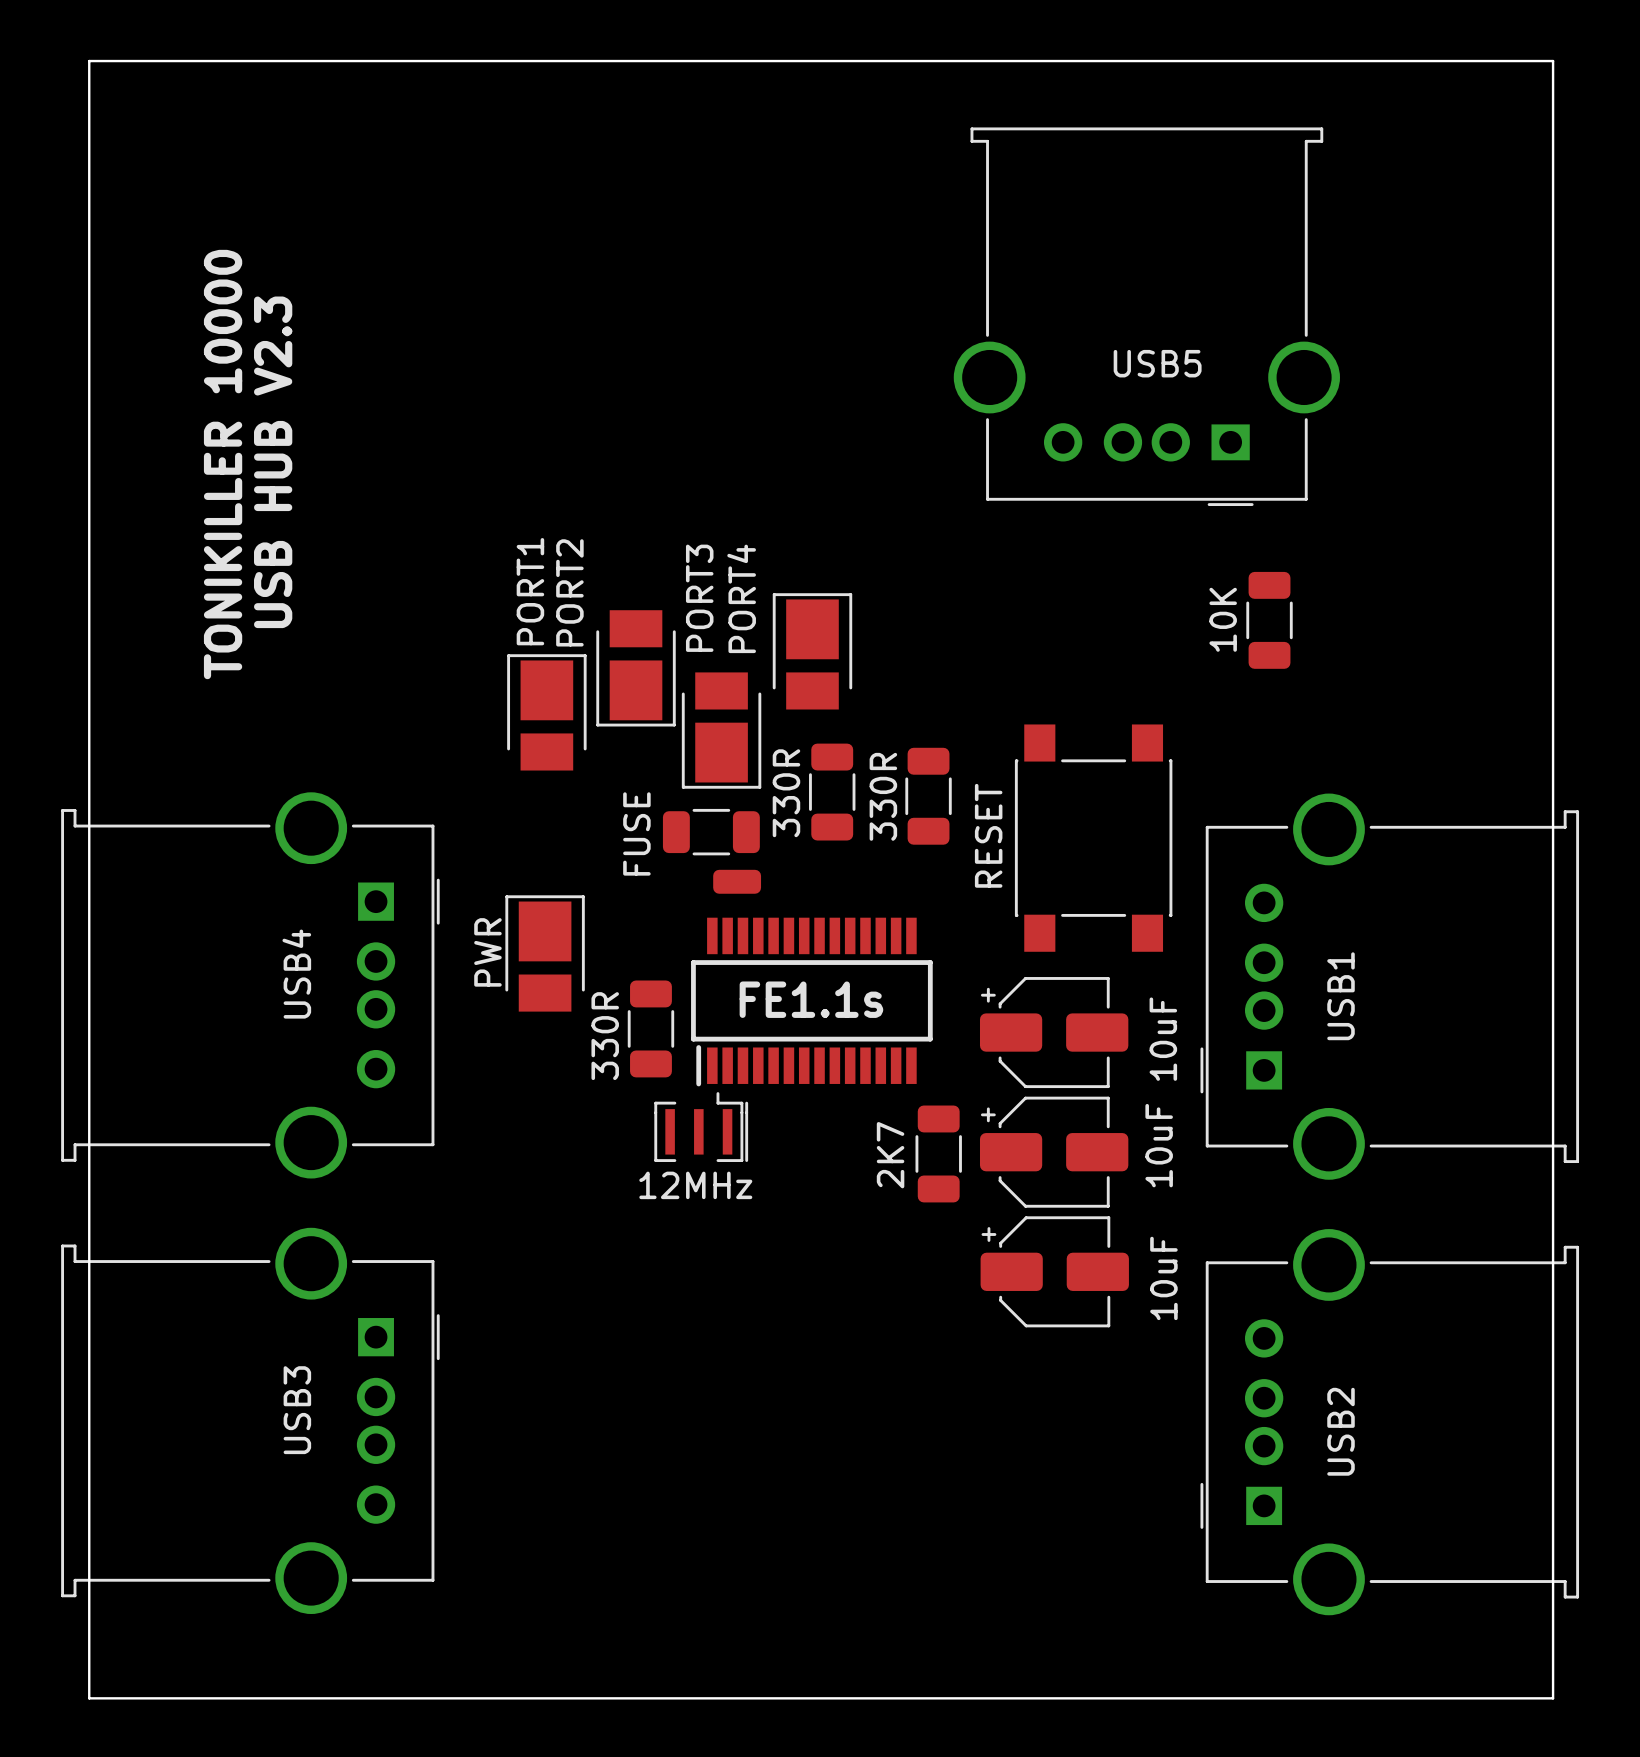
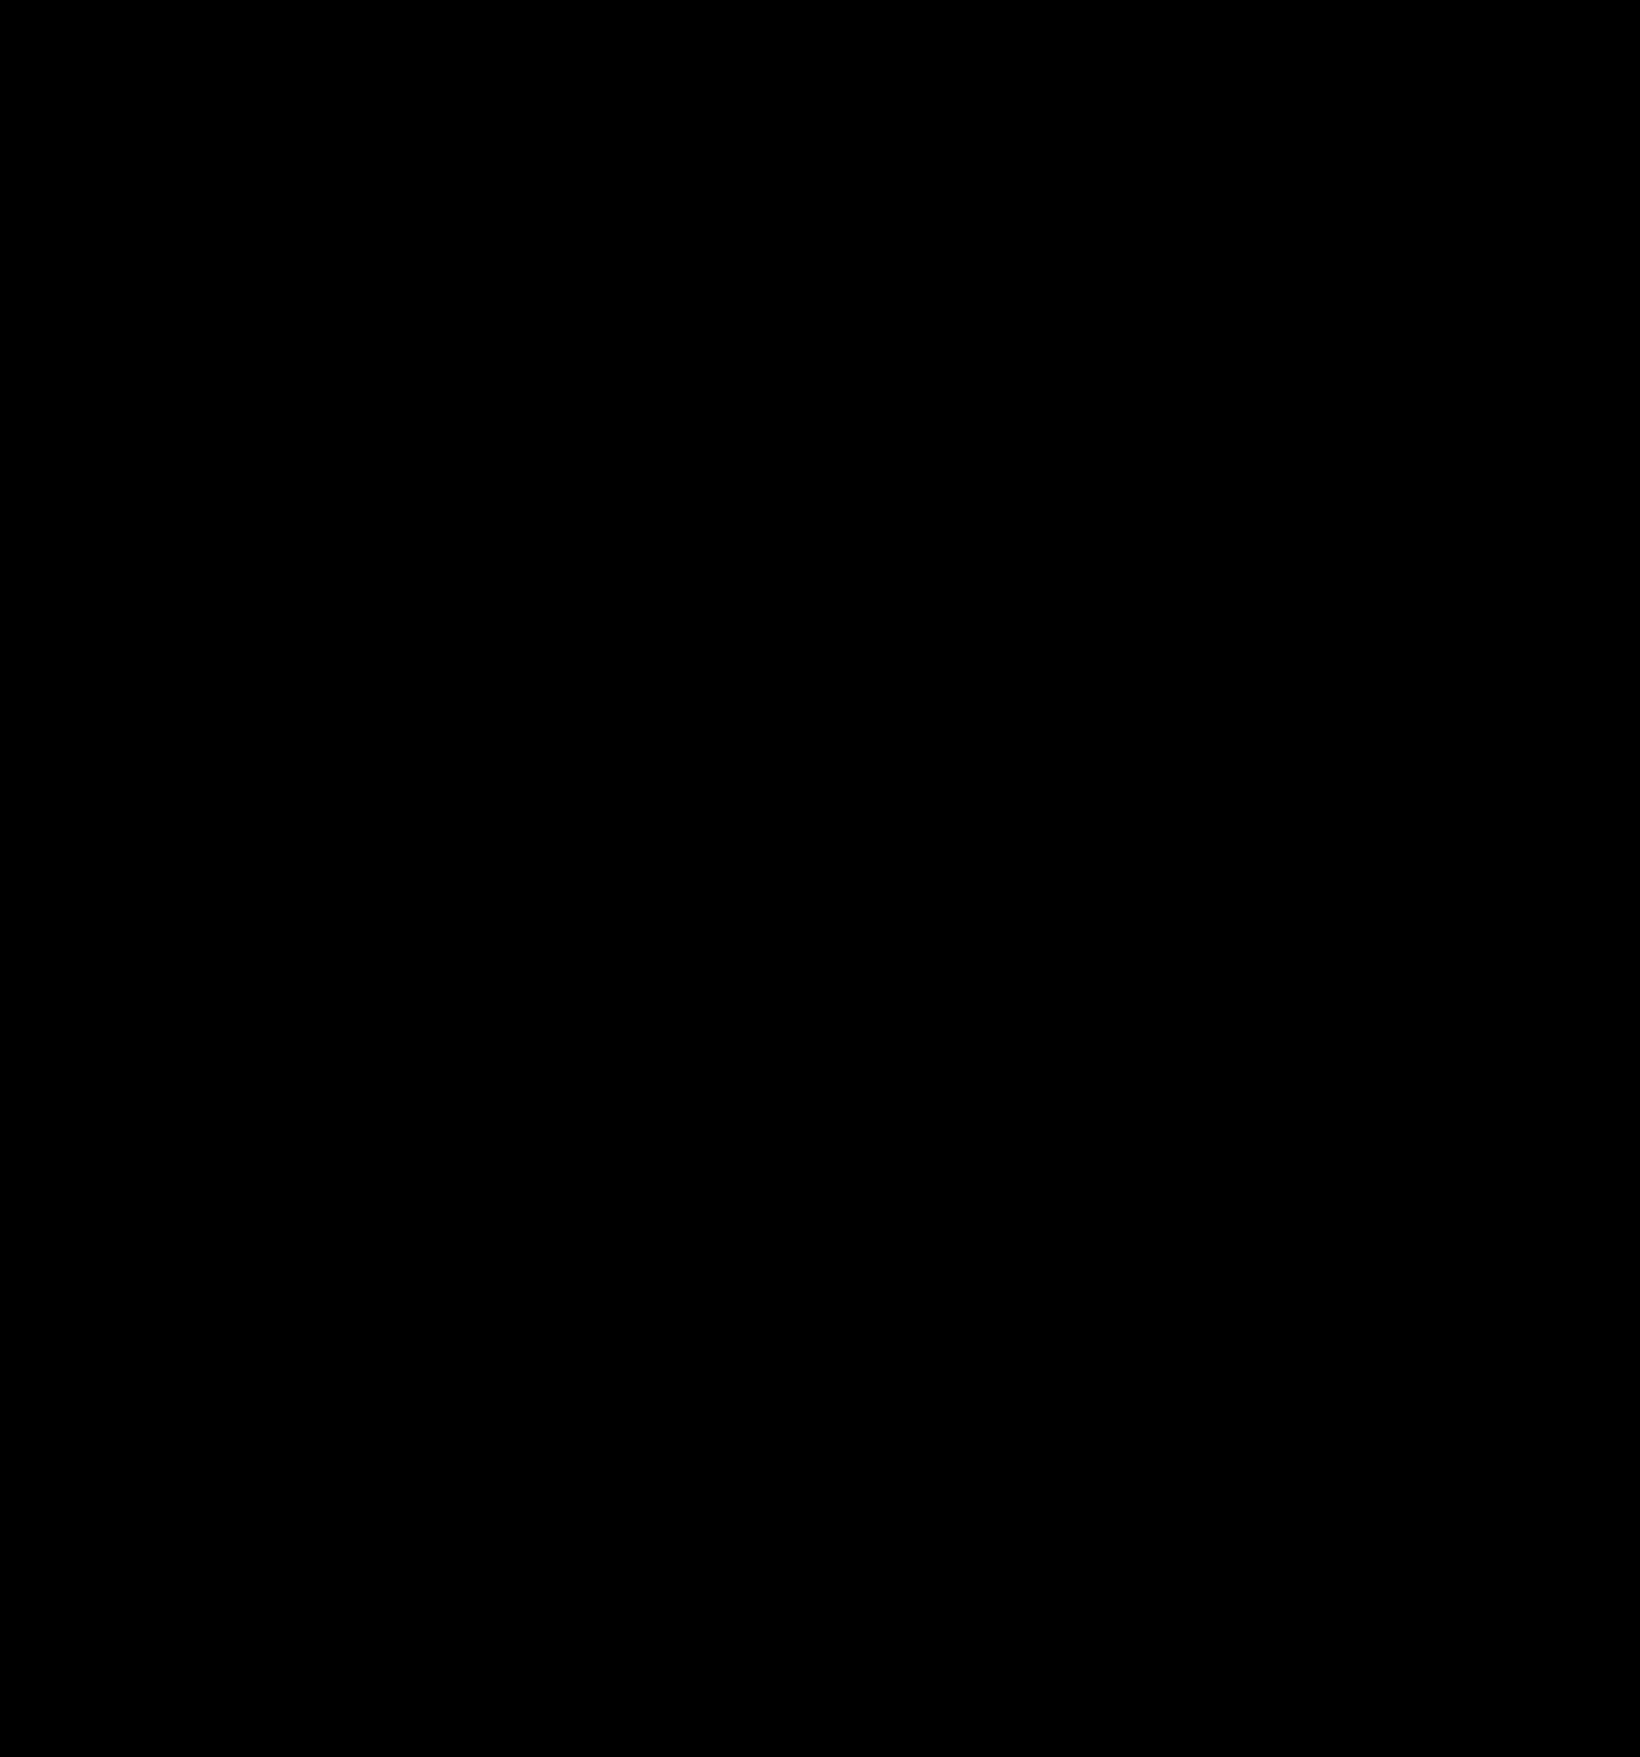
board edge: (89, 61) (89, 1698) (1553, 1698) (1553, 61) (89, 61) -> none
USB5: (1146, 316) -> none
text: USB HUB V2.3 (273, 462) -> none
text: TONIKILLER 10000 (223, 464) -> none
10K: (1269, 620) -> none
PORT4: (812, 651) -> none
PORT2: (636, 668) -> none
PORT1: (546, 712) -> none
PORT3: (721, 730) -> none
330R: (832, 792) -> none
330R: (928, 796) -> none
FUSE: (711, 832) -> none
RESET: (1093, 838) -> none
part: (737, 881) -> none
PWR: (545, 953) -> none
USB4: (250, 985) -> none
USB1: (1389, 986) -> none
FE1.1s: (811, 1002) -> none
330R: (650, 1028) -> none
10uF: (1054, 1032) -> none
12MHz: (701, 1127) -> none
10uF: (1054, 1152) -> none
2K7: (938, 1153) -> none
10uF: (1054, 1271) -> none
USB3: (250, 1420) -> none
USB2: (1389, 1422) -> none

